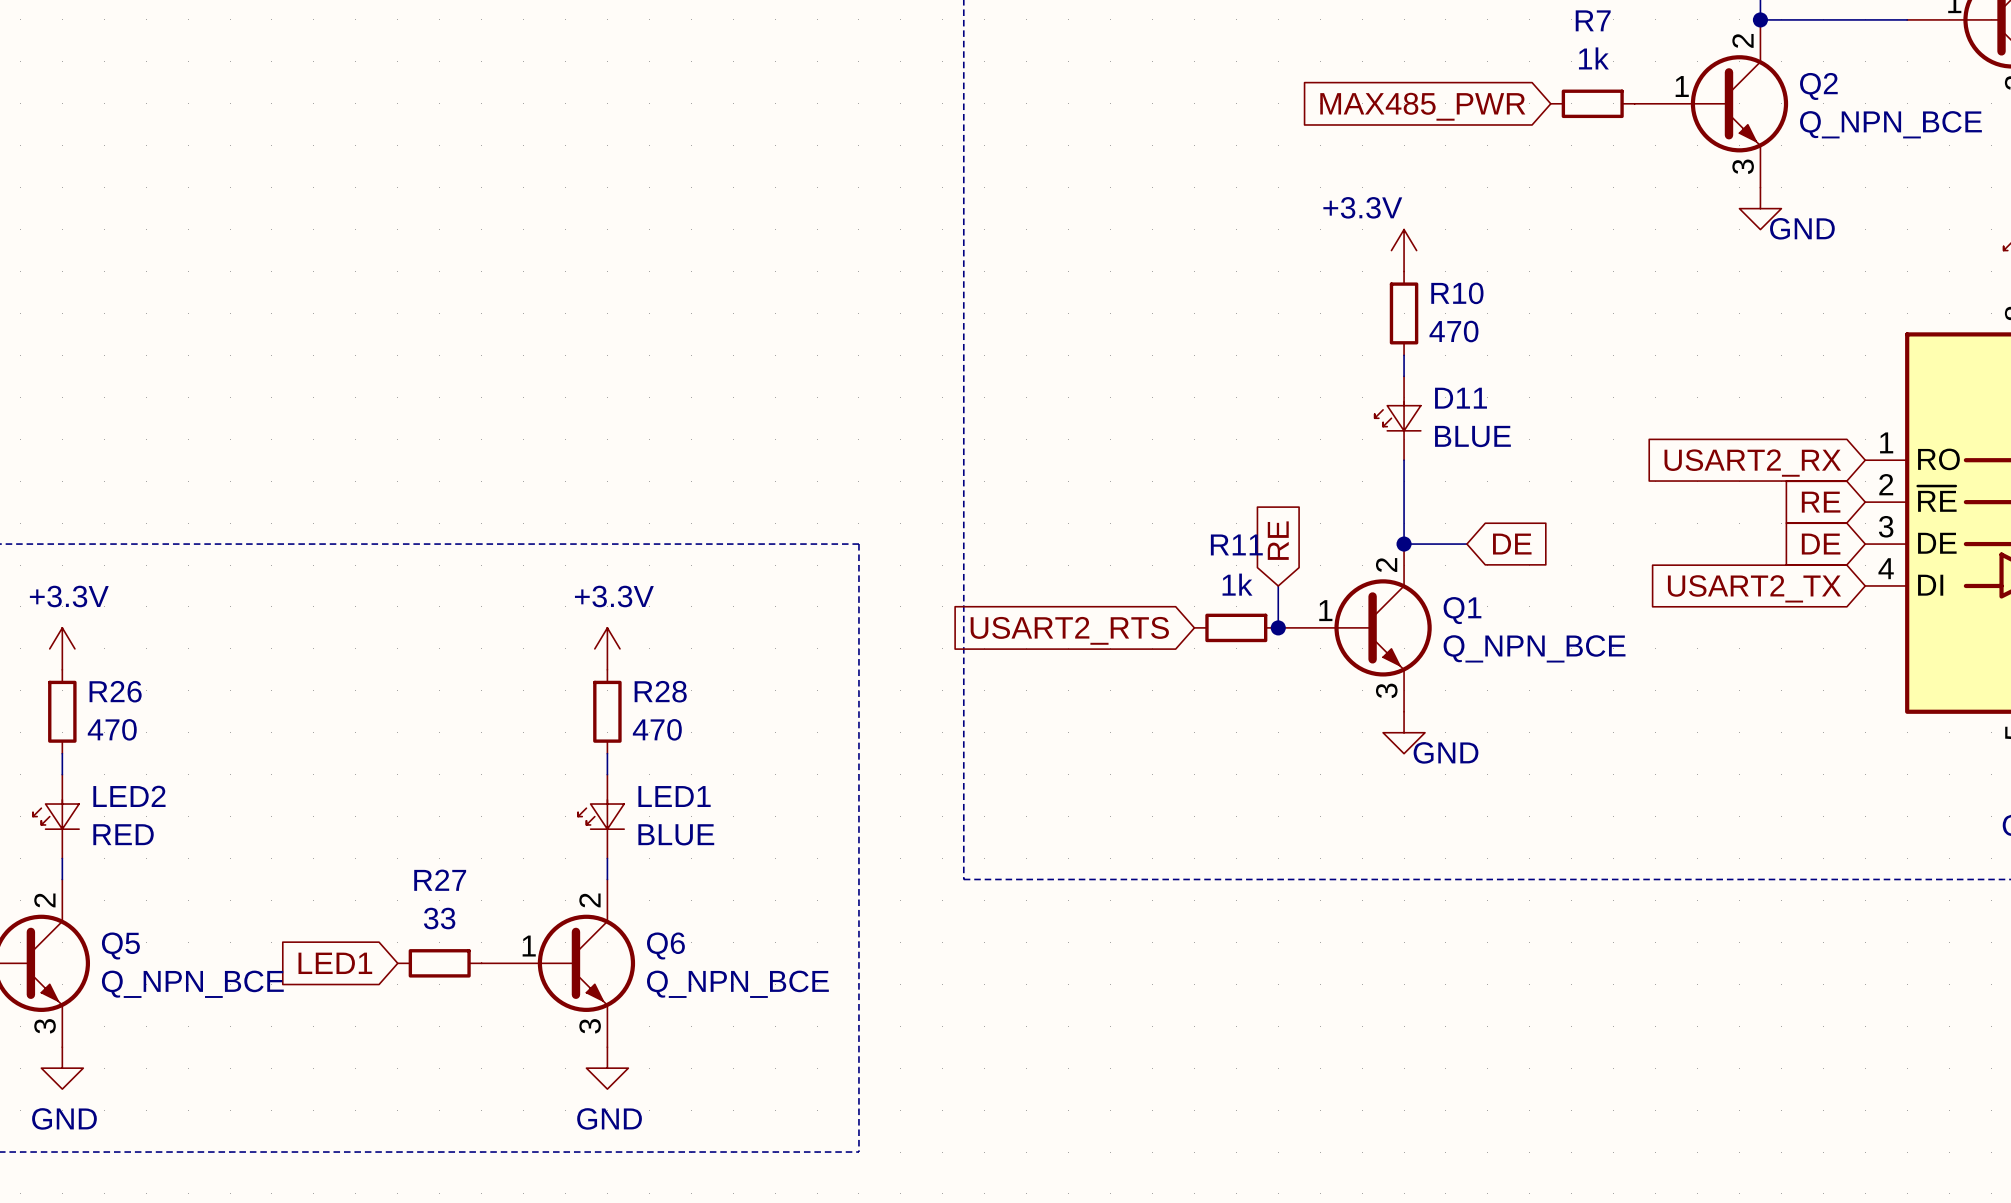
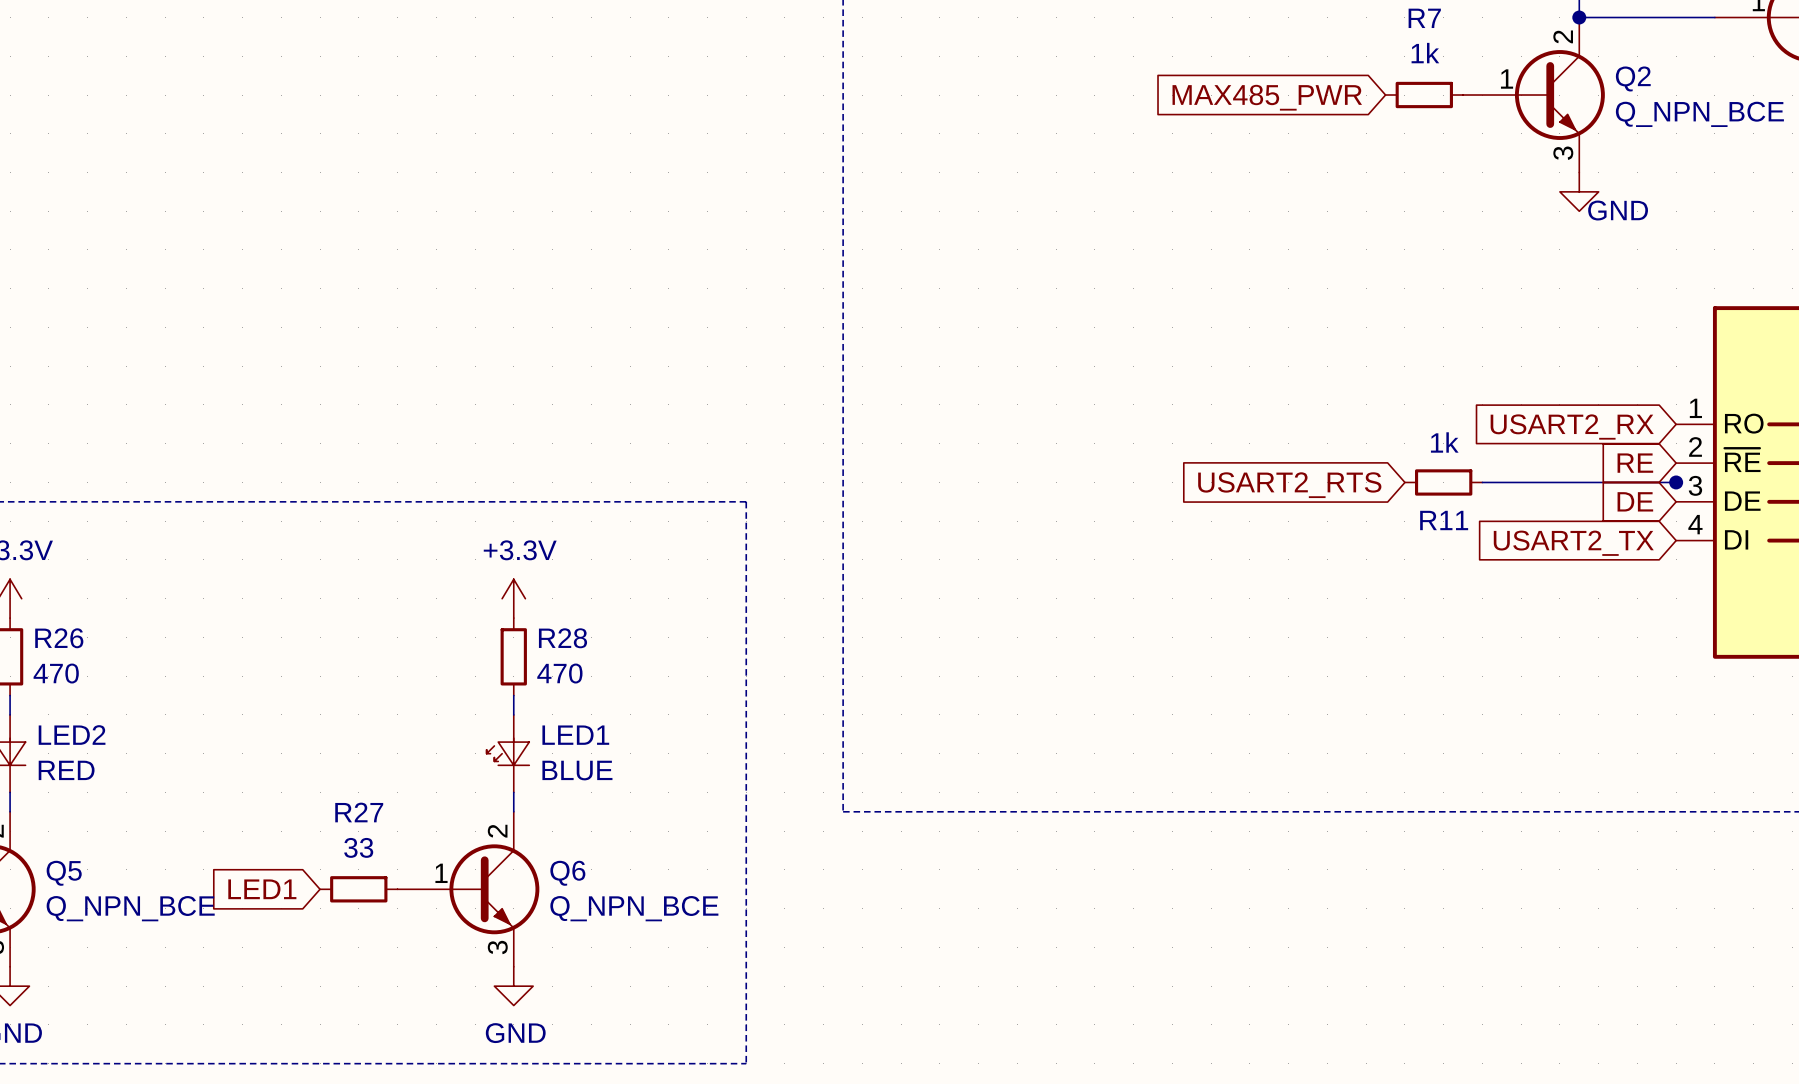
power symbol: +3.3V (1404, 250) -> none
R10: 470 (1404, 313) -> none
wire: (1404, 355) (1404, 376) -> none
D11: BLUE (1397, 418) -> none
wire: (1404, 460) (1404, 544) (1466, 544) -> none
wire: none -> (1482, 482) (1676, 482)
junction: none -> (1676, 482)
global label: RE (1278, 540) -> none
R11 name position: R11 (1236, 544) -> R11 (1444, 520)
junction: (1404, 544) -> none
global label: DE (1512, 544) -> none
wire: (1278, 585) (1278, 627) -> none
R11 position: (1236, 627) -> (1443, 482)
junction: (1278, 627) -> none
Q1: Q_NPN_BCE (1354, 627) -> none
global label position: USART2_RTS (1069, 630) -> USART2_RTS (1289, 485)
power symbol: GND (1404, 732) -> none

